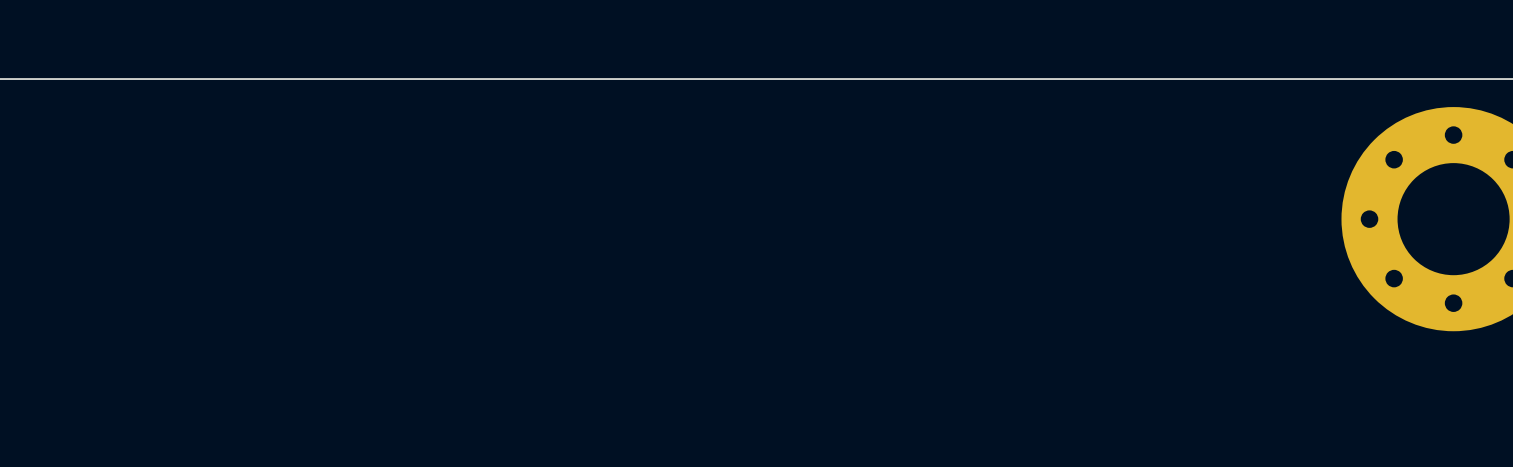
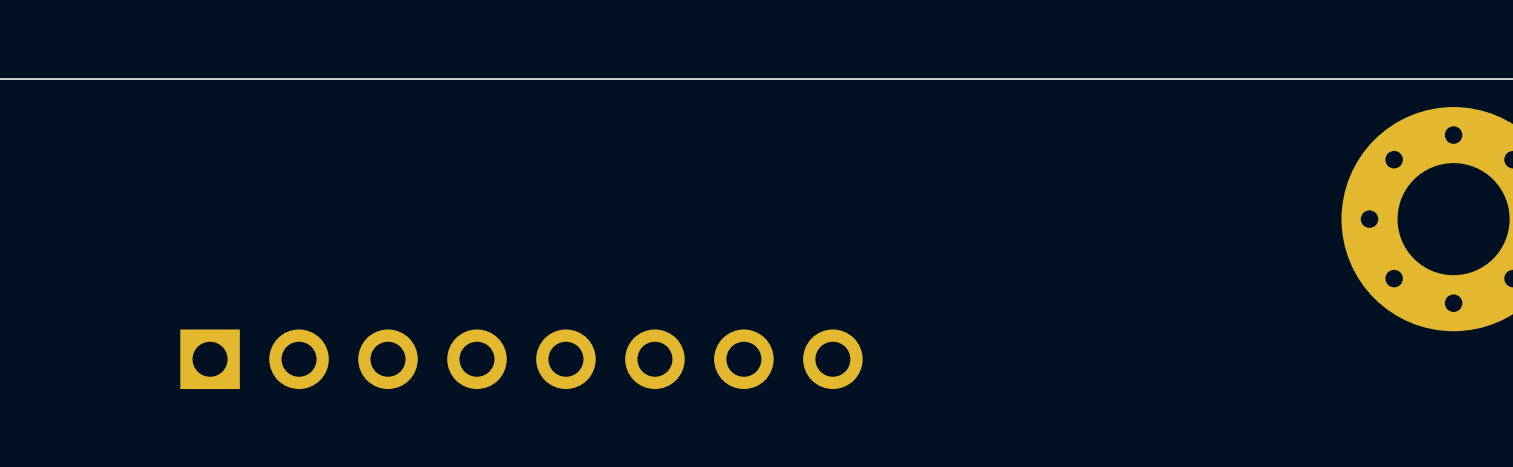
part: none -> (521, 359)

